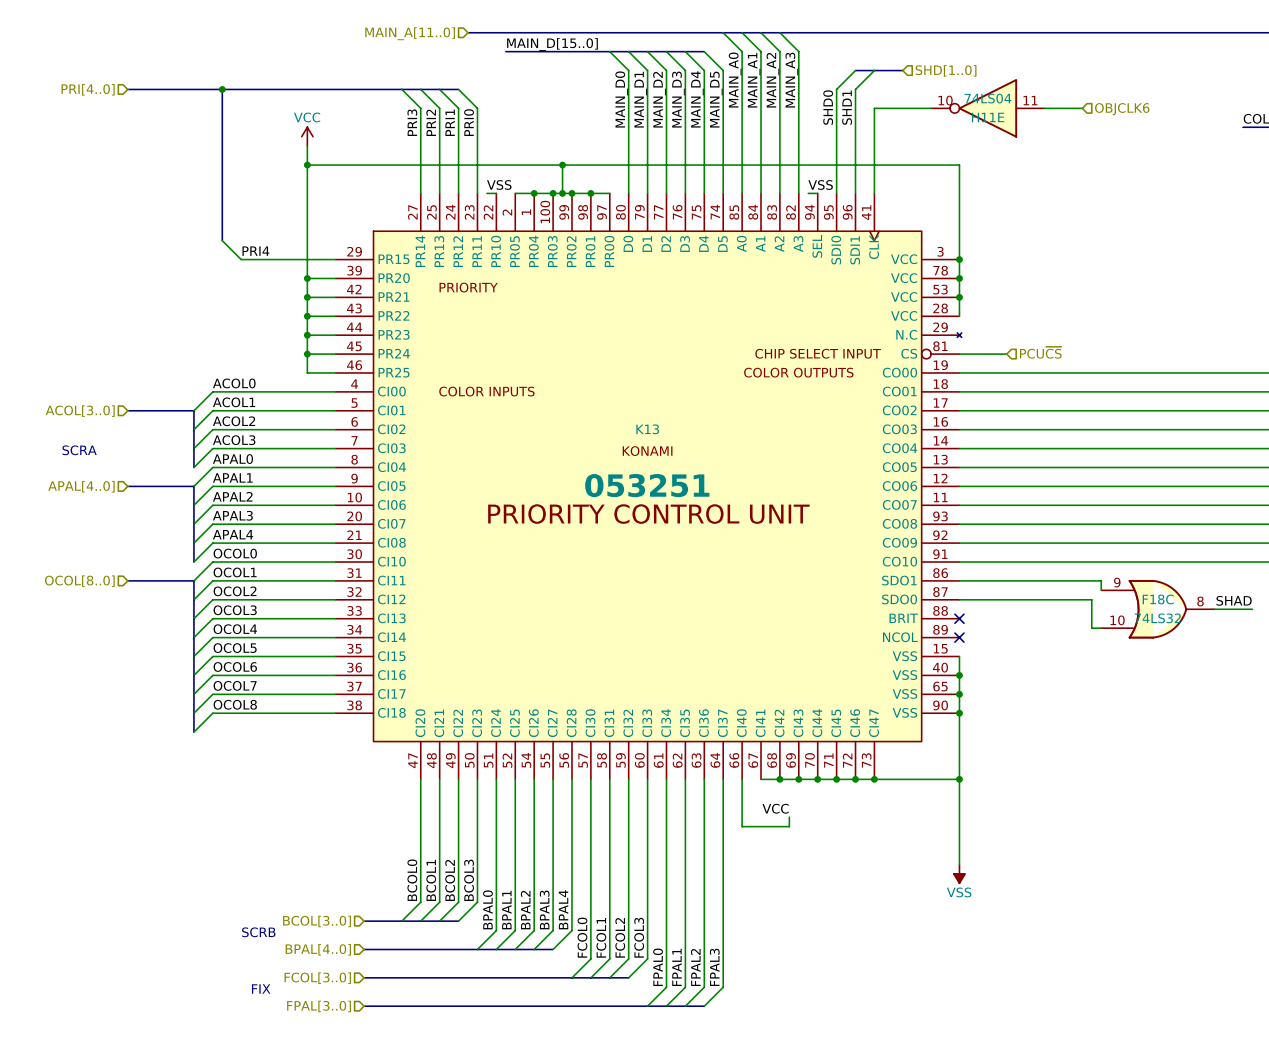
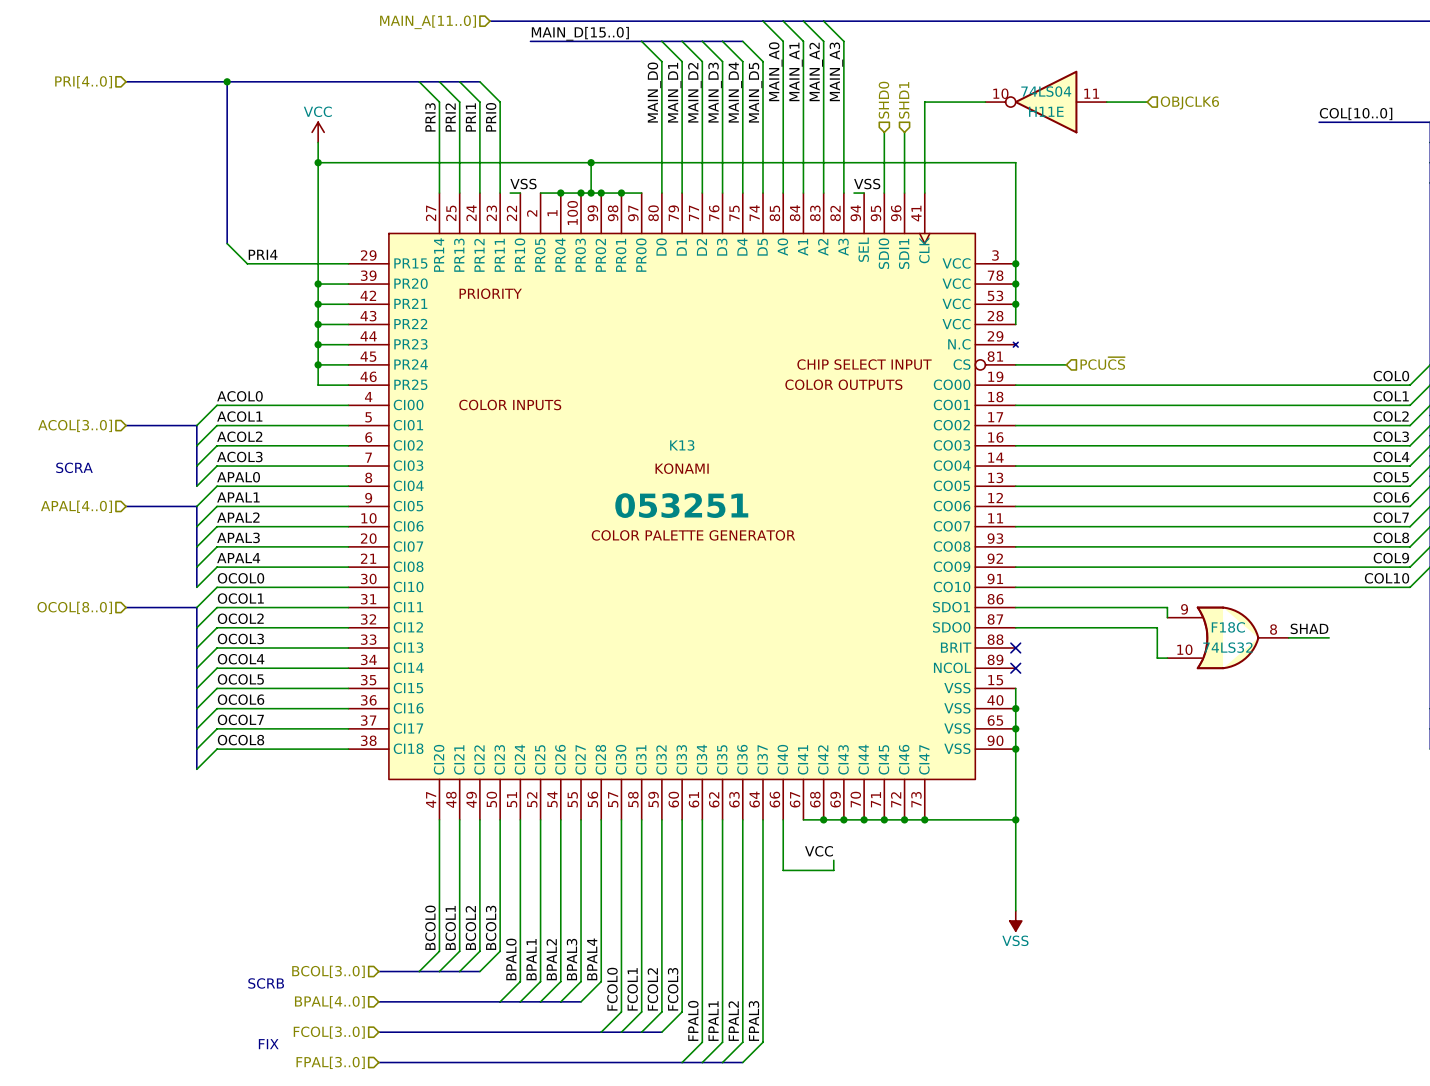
wire: (855, 70) (836, 89) (836, 136) -> none
bus: (855, 70) (902, 70) -> none
wire: (874, 70) (855, 89) (855, 136) -> none
hierarchical label: SHD[1..0] (946, 70) -> none
hierarchical label: none -> SHD0 (883, 100)
hierarchical label: none -> SHD1 (904, 100)
label: SHD0 (828, 107) -> none
label: SHD1 (847, 107) -> none
K13 text: none -> COLOR PALETTE GENERATOR (693, 535)
K13 text: PRIORITY CONTROL UNIT (648, 514) -> none

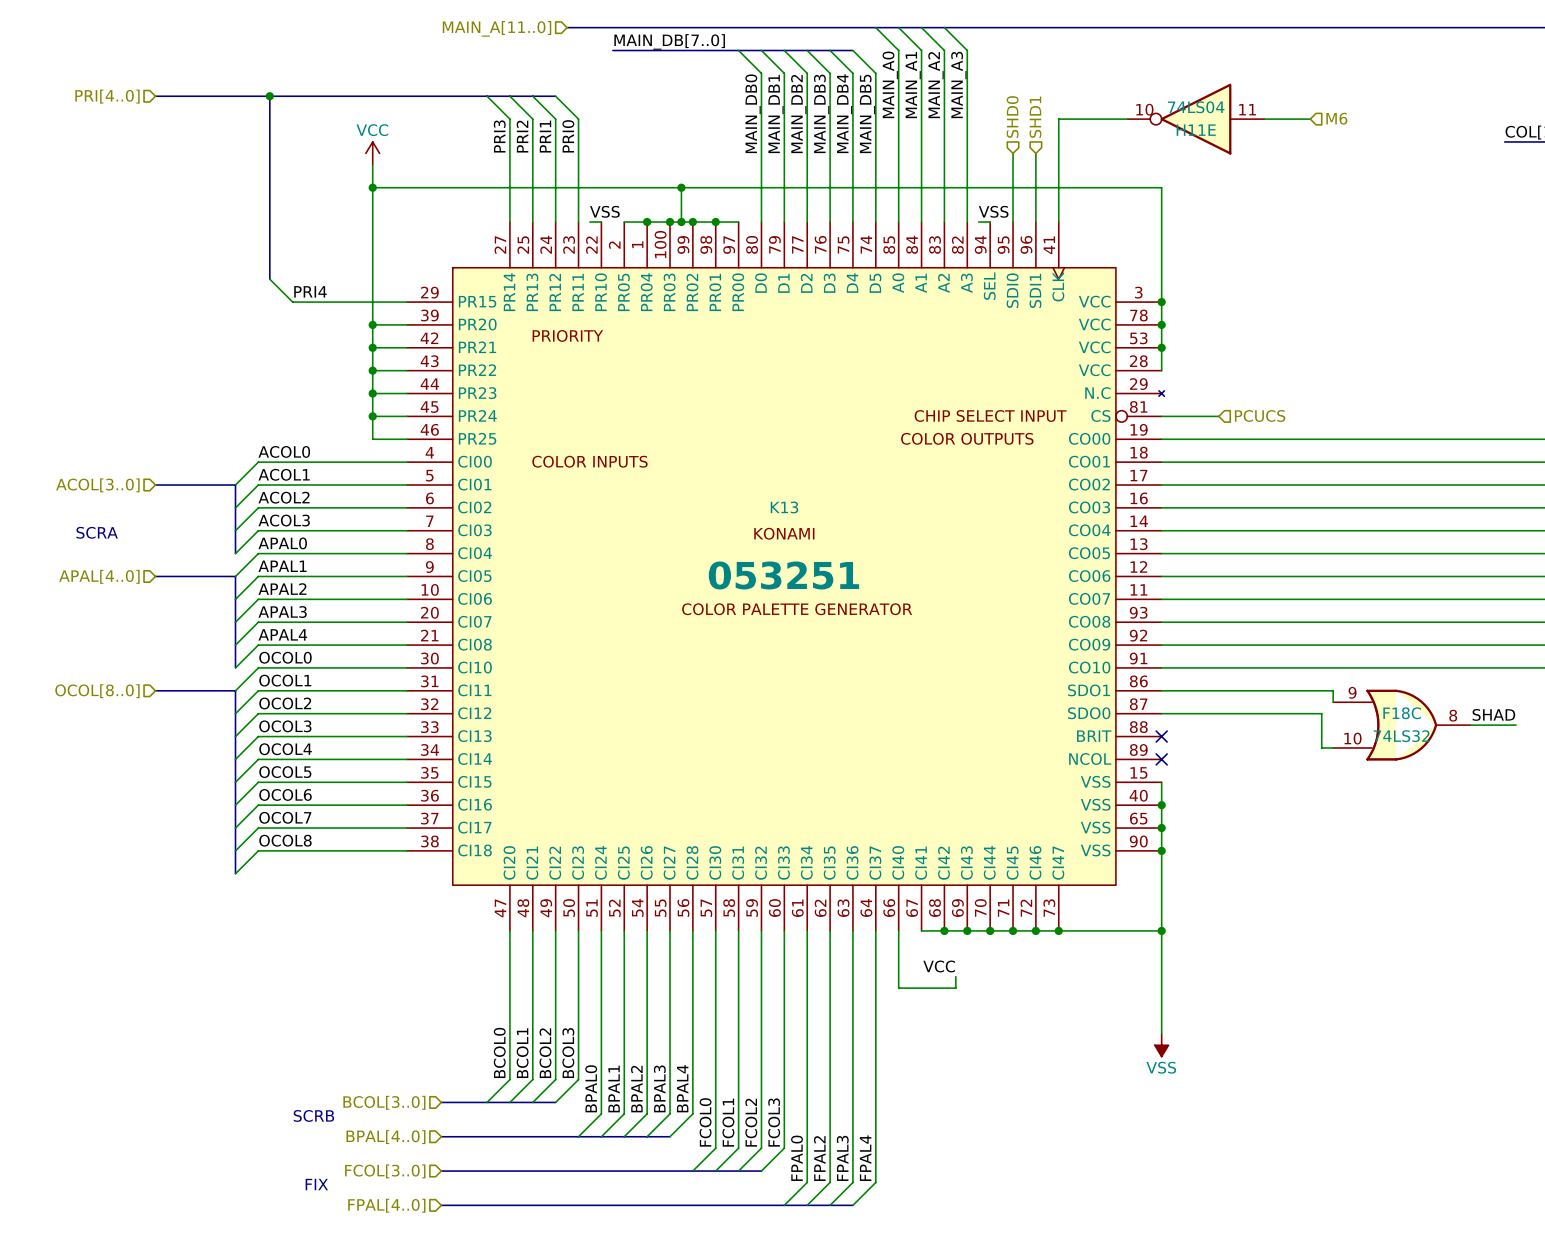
label: MAIN_D[15..0] (580, 33) -> MAIN_DB[7..0] (669, 41)
label: MAIN_D0 (654, 92) -> MAIN_DB0 (753, 113)
label: MAIN_D1 (674, 92) -> MAIN_DB1 (775, 113)
label: MAIN_D2 (694, 92) -> MAIN_DB2 (798, 114)
label: MAIN_D3 (715, 92) -> MAIN_DB3 (821, 113)
label: MAIN_D4 (735, 92) -> MAIN_DB4 (844, 113)
label: MAIN_D5 (755, 92) -> MAIN_DB5 (867, 113)
hierarchical label: OBJCLK6 (1189, 102) -> M6 (1336, 118)
hierarchical label: PCU~{CS} (1102, 363) -> PCUCS (1260, 415)
label: FPAL3 (753, 1020) -> FPAL4 (865, 1158)
label: FPAL1 (713, 1021) -> FPAL2 (819, 1158)
label: FPAL2 (733, 1021) -> FPAL3 (842, 1158)
hierarchical label: FPAL[3..0] (330, 1062) -> FPAL[4..0] (386, 1205)

